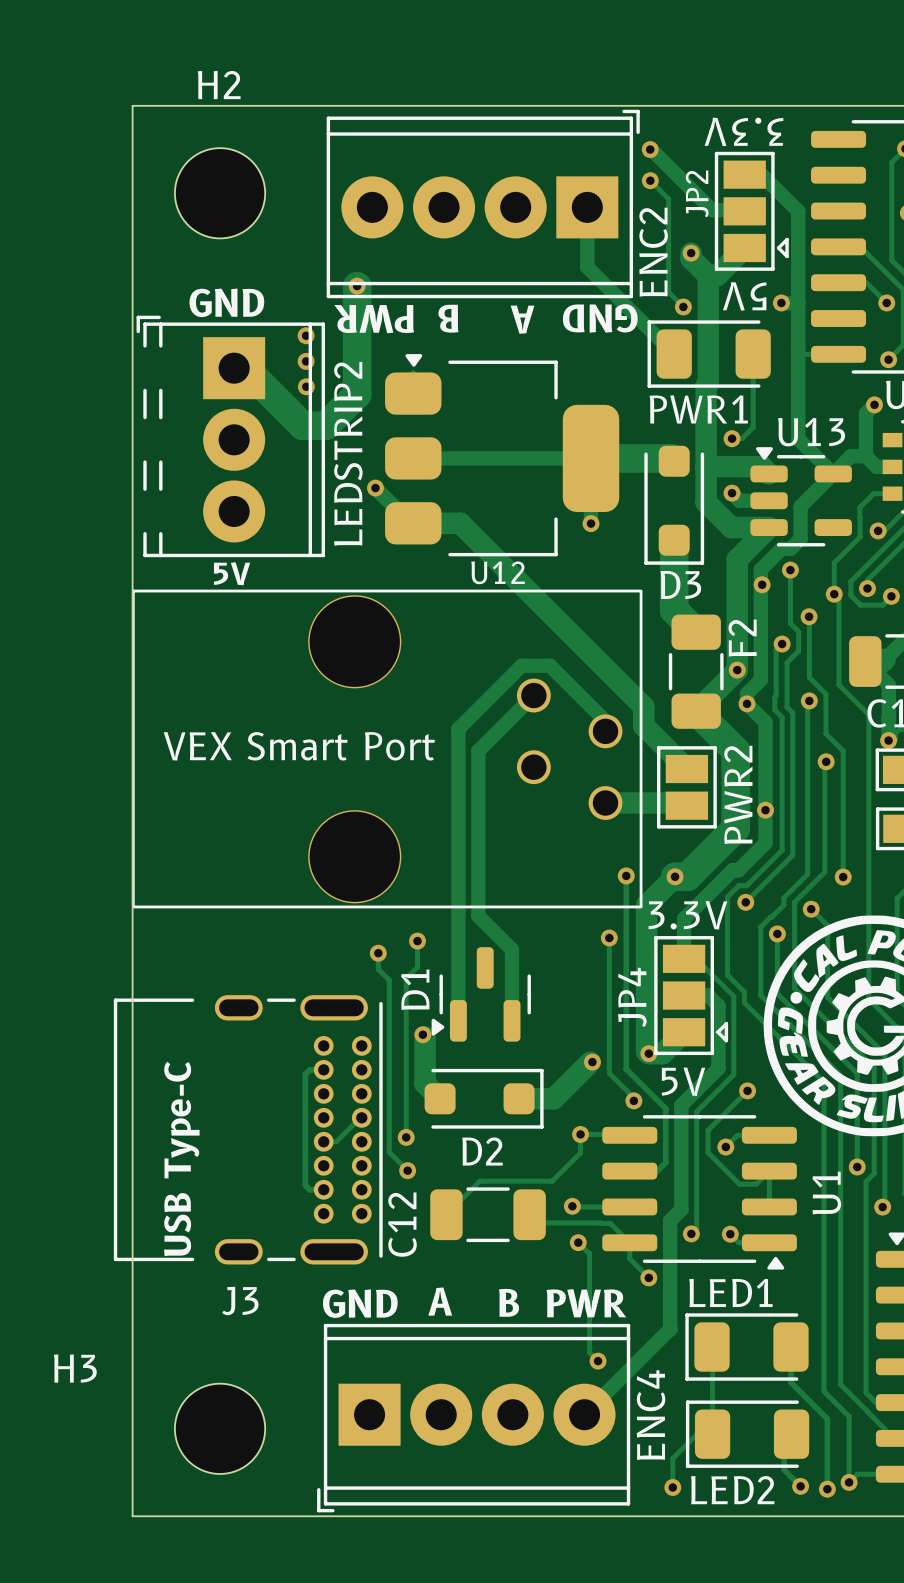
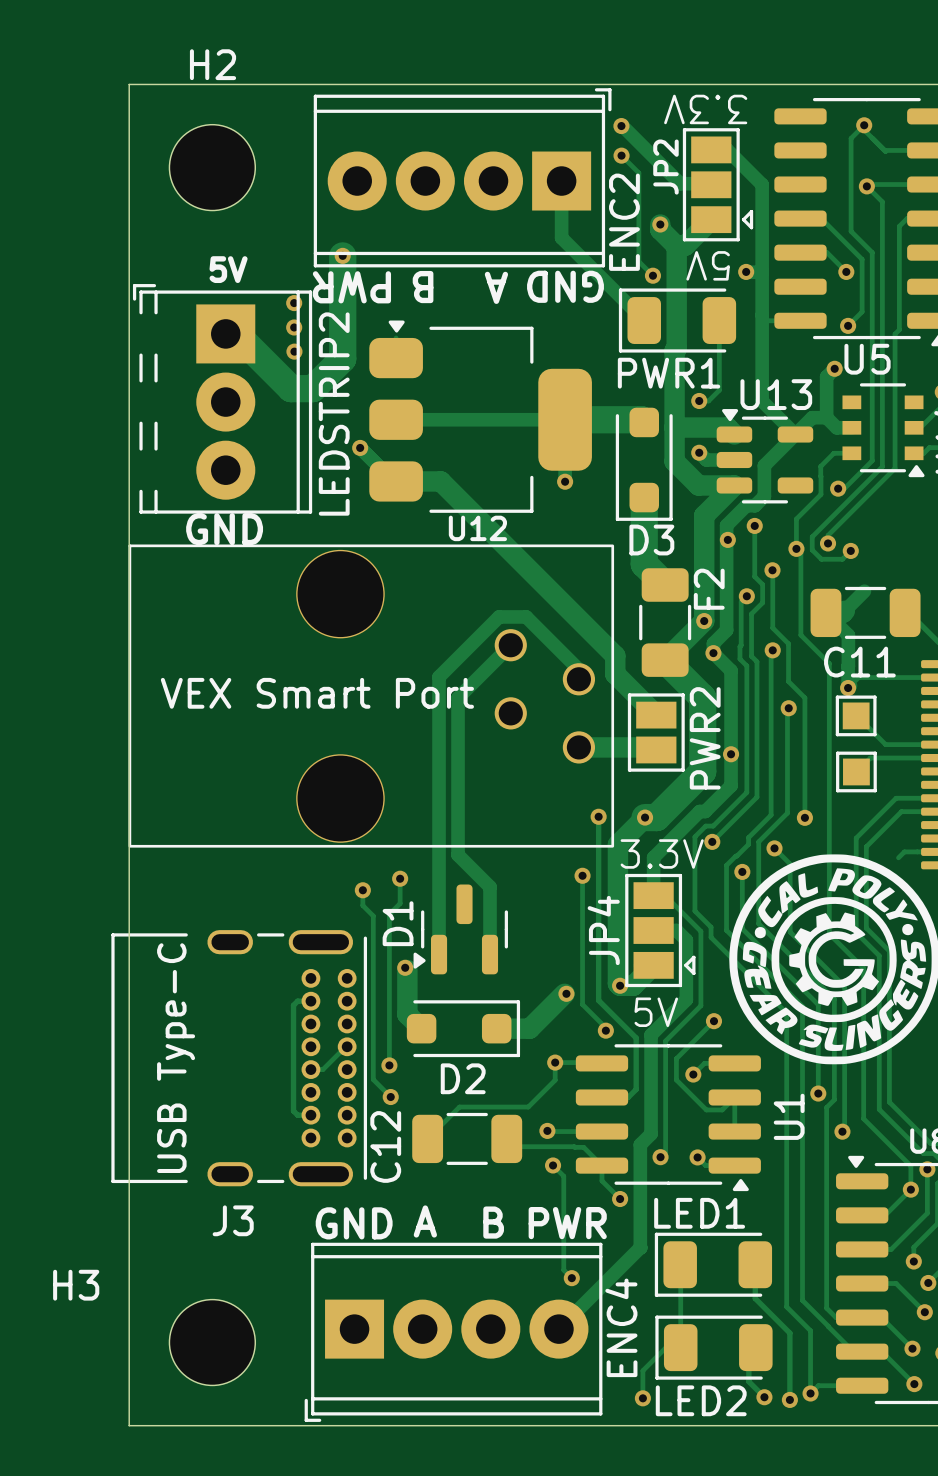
text: GND (226, 302) -> 5V (228, 269)
text: 5V (232, 573) -> GND (224, 529)

